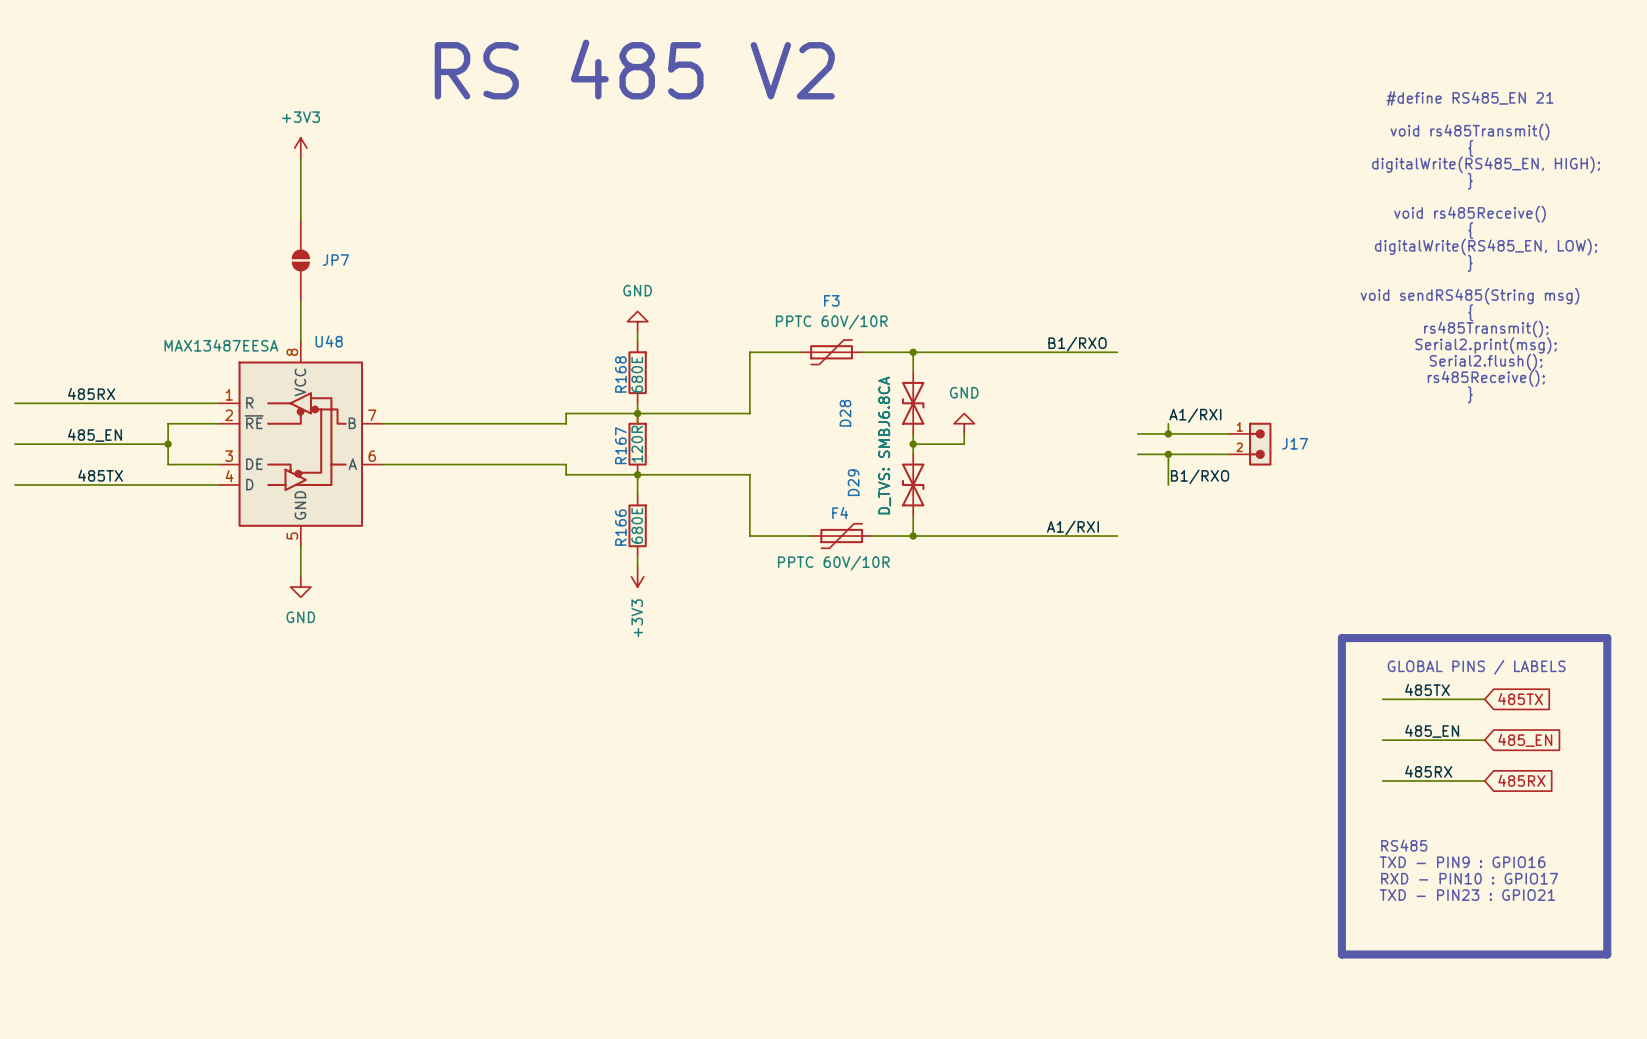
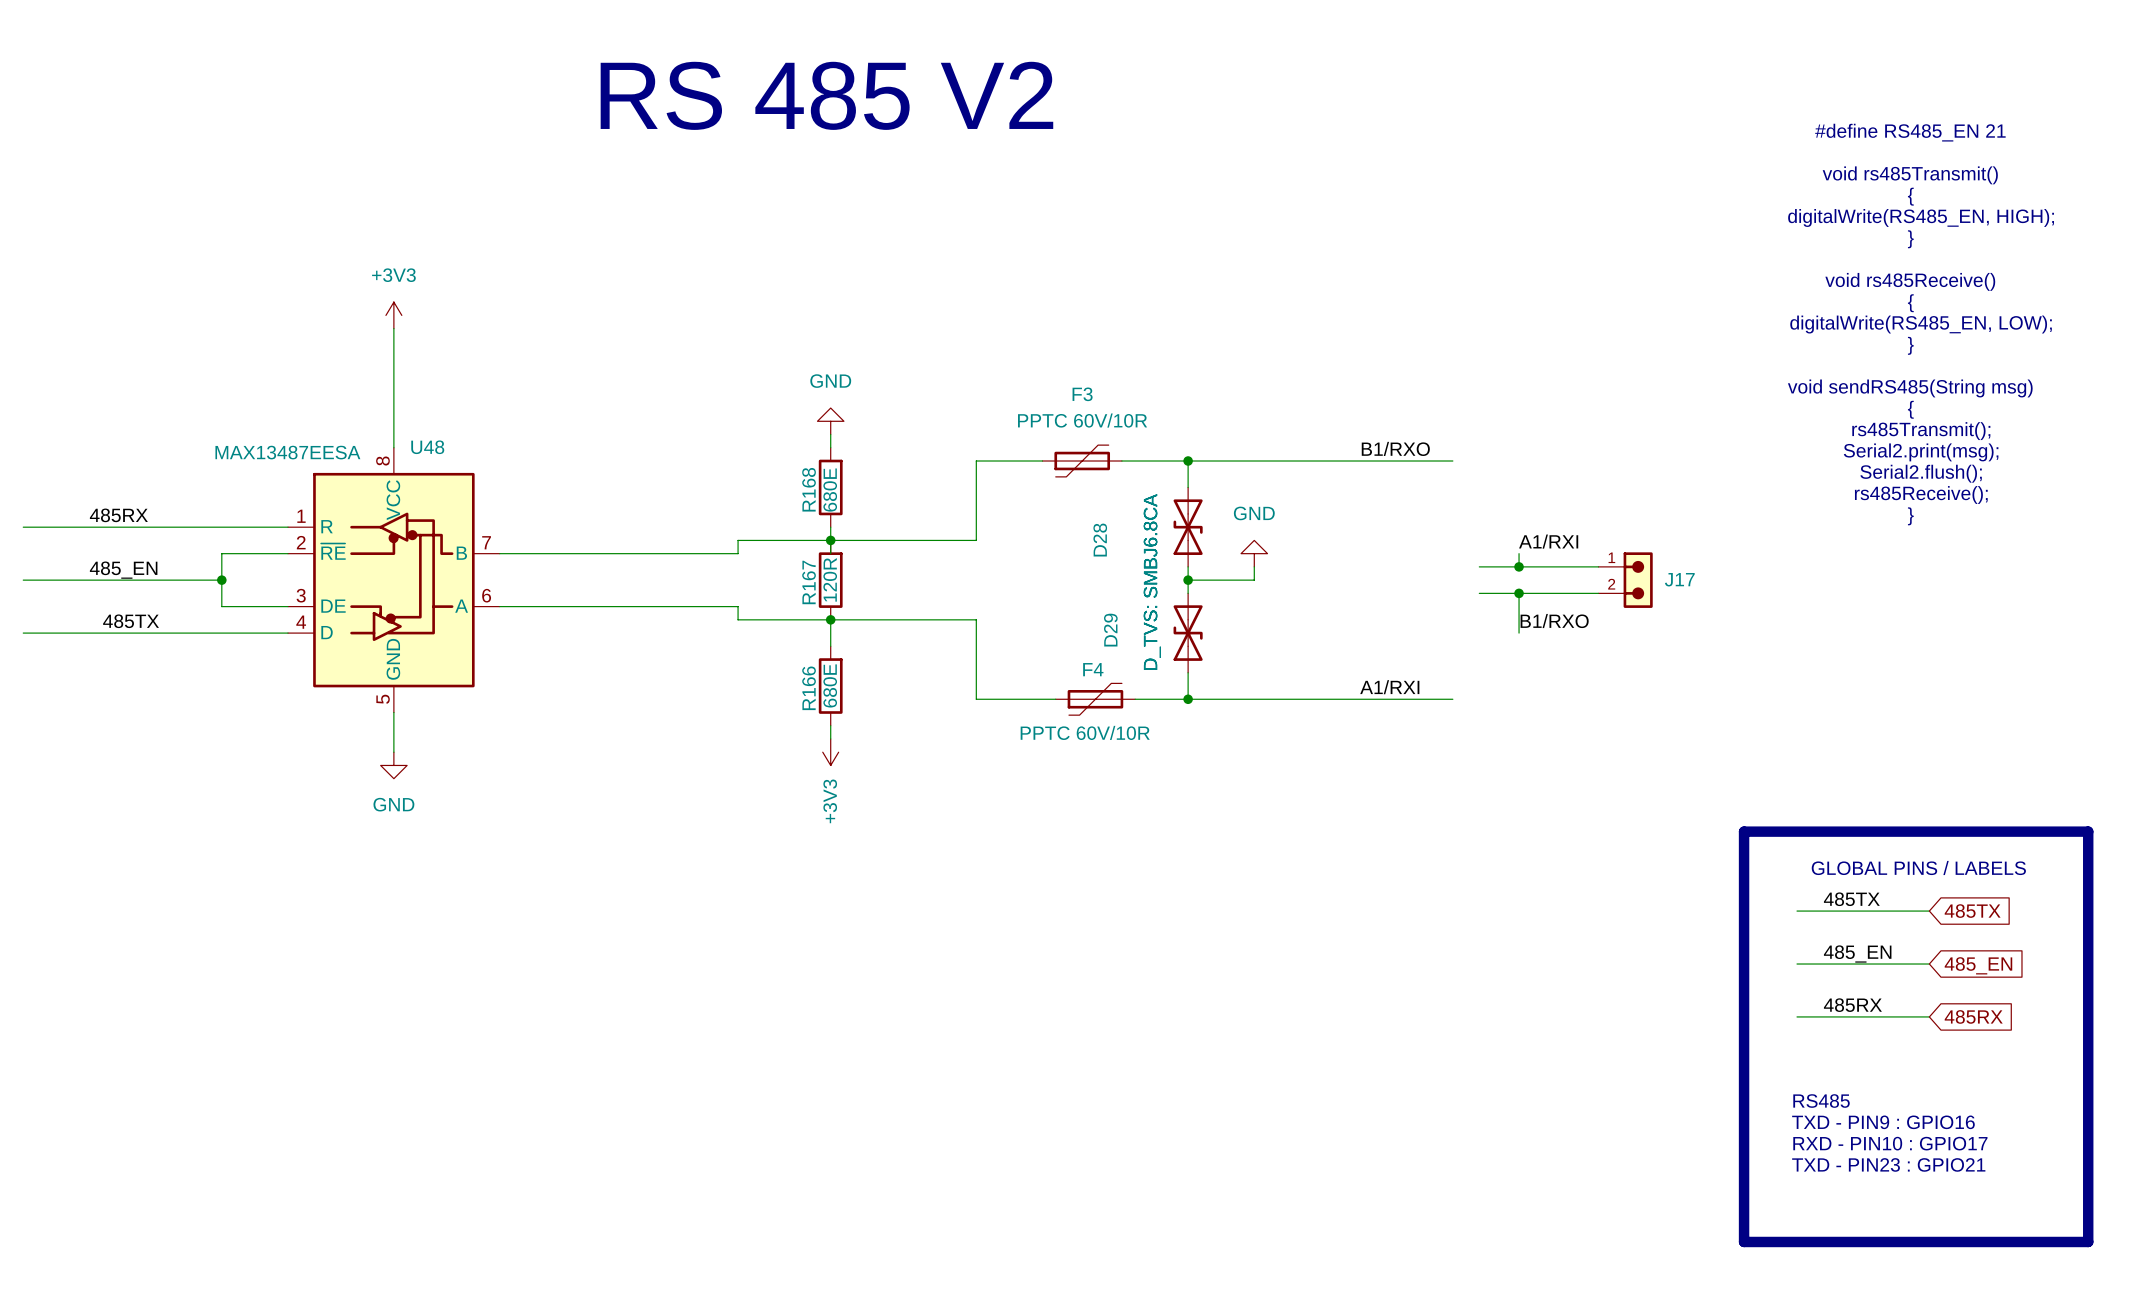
power symbol position: +3V3 (300, 148) -> +3V3 (393, 315)
wire: (300, 158) (300, 219) -> none
JP7: (300, 260) -> none

